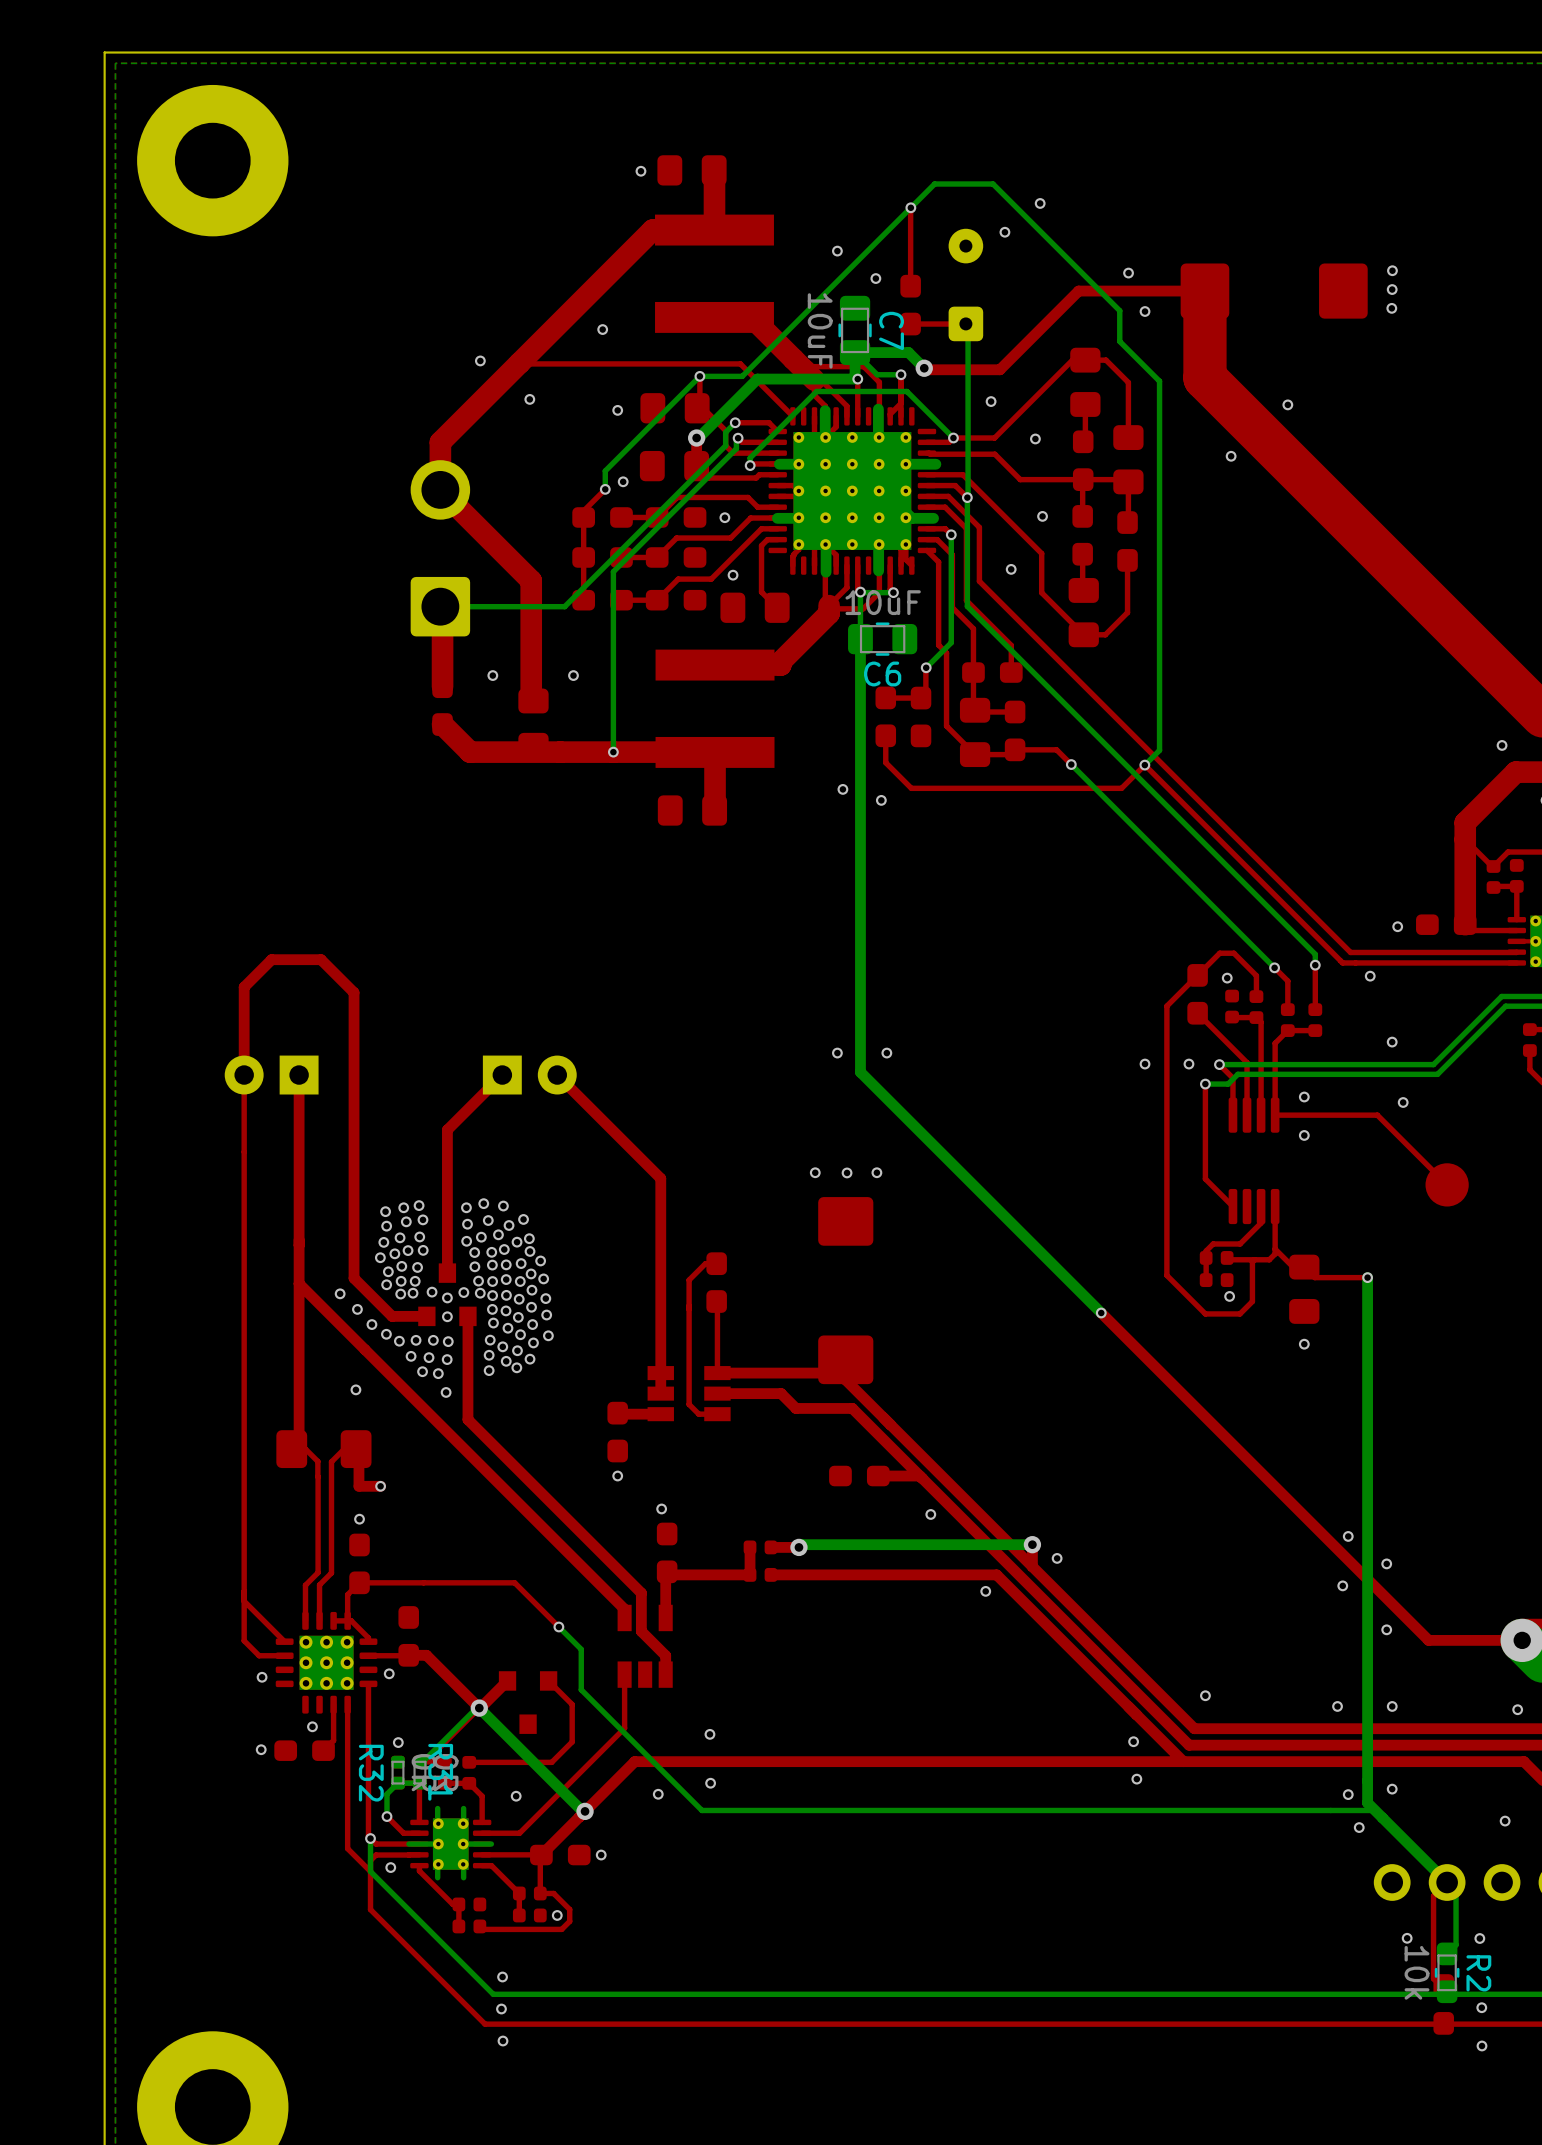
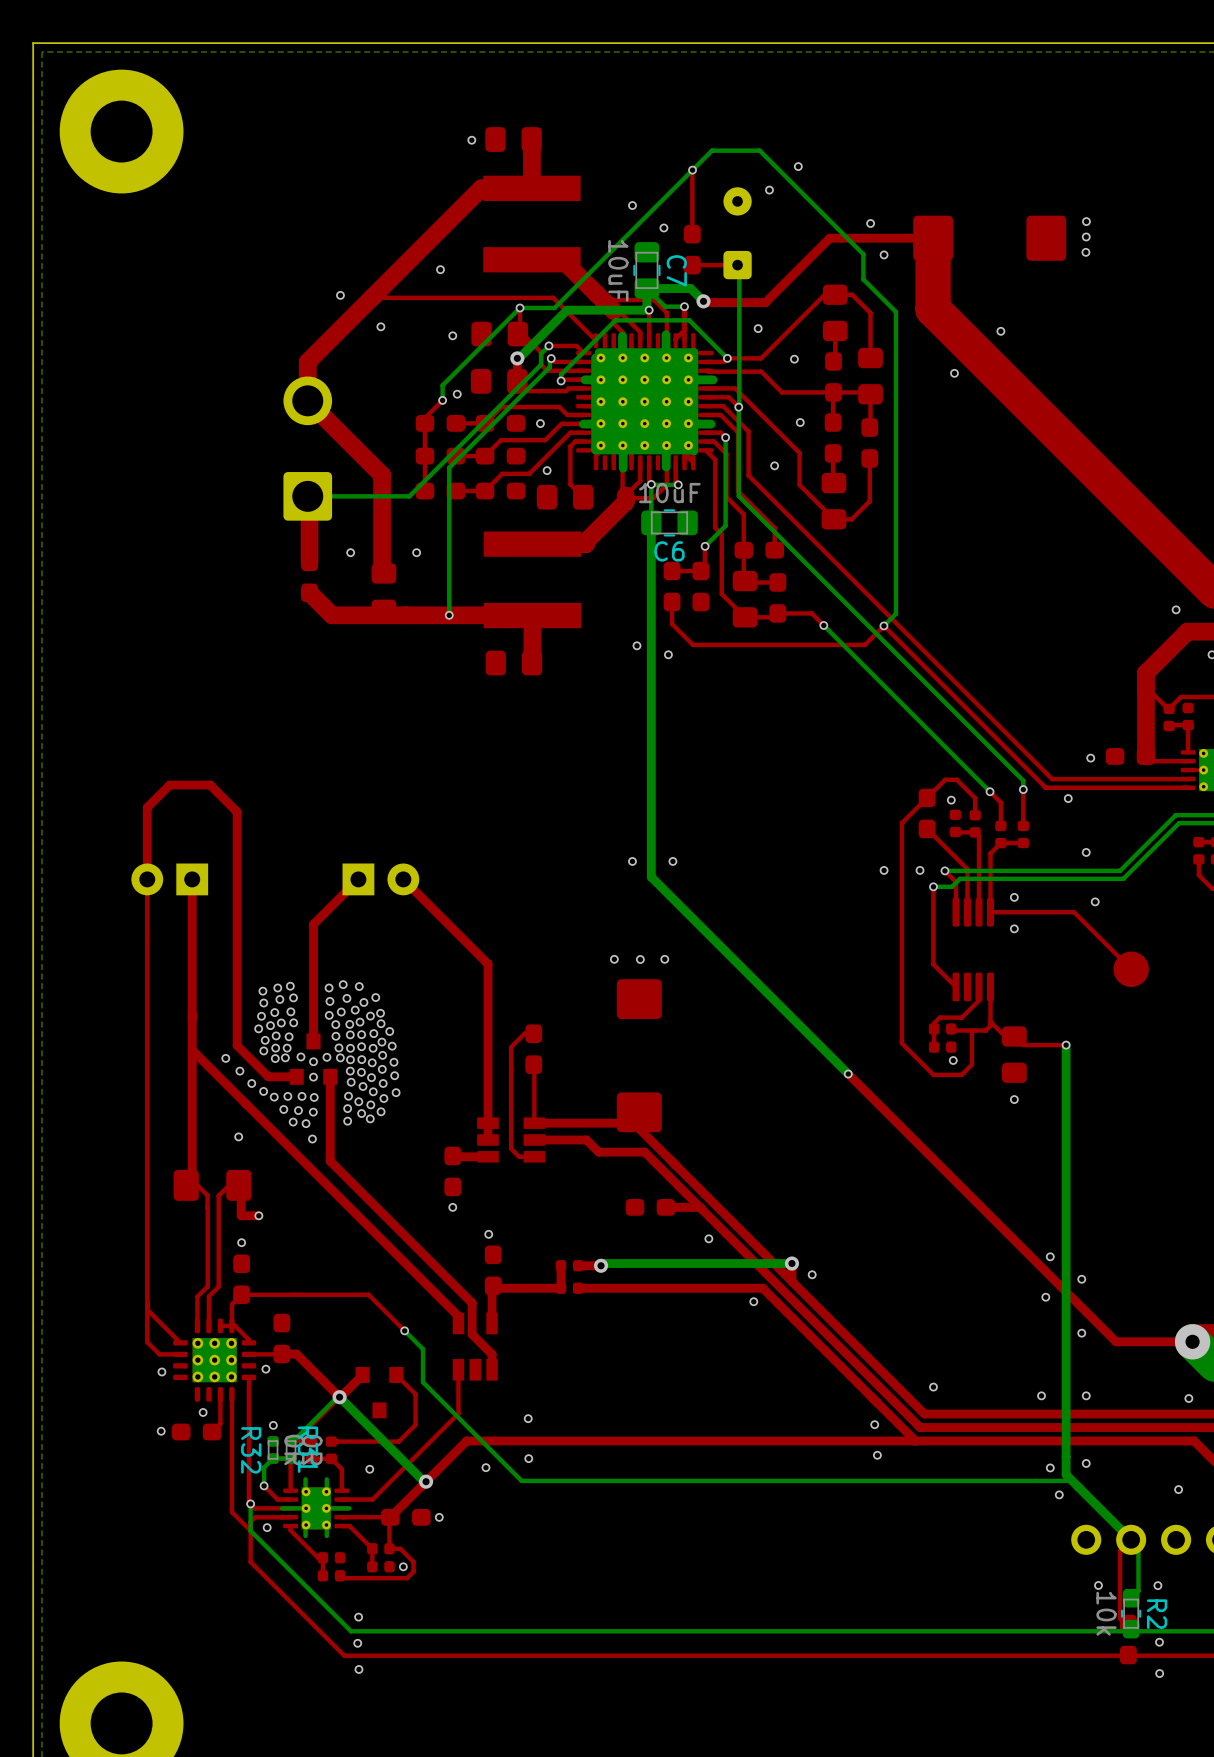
bottom track: none -> (693, 352) (693, 450) (595, 449) (595, 357)
bottom track: none -> (693, 352) (599, 352)

